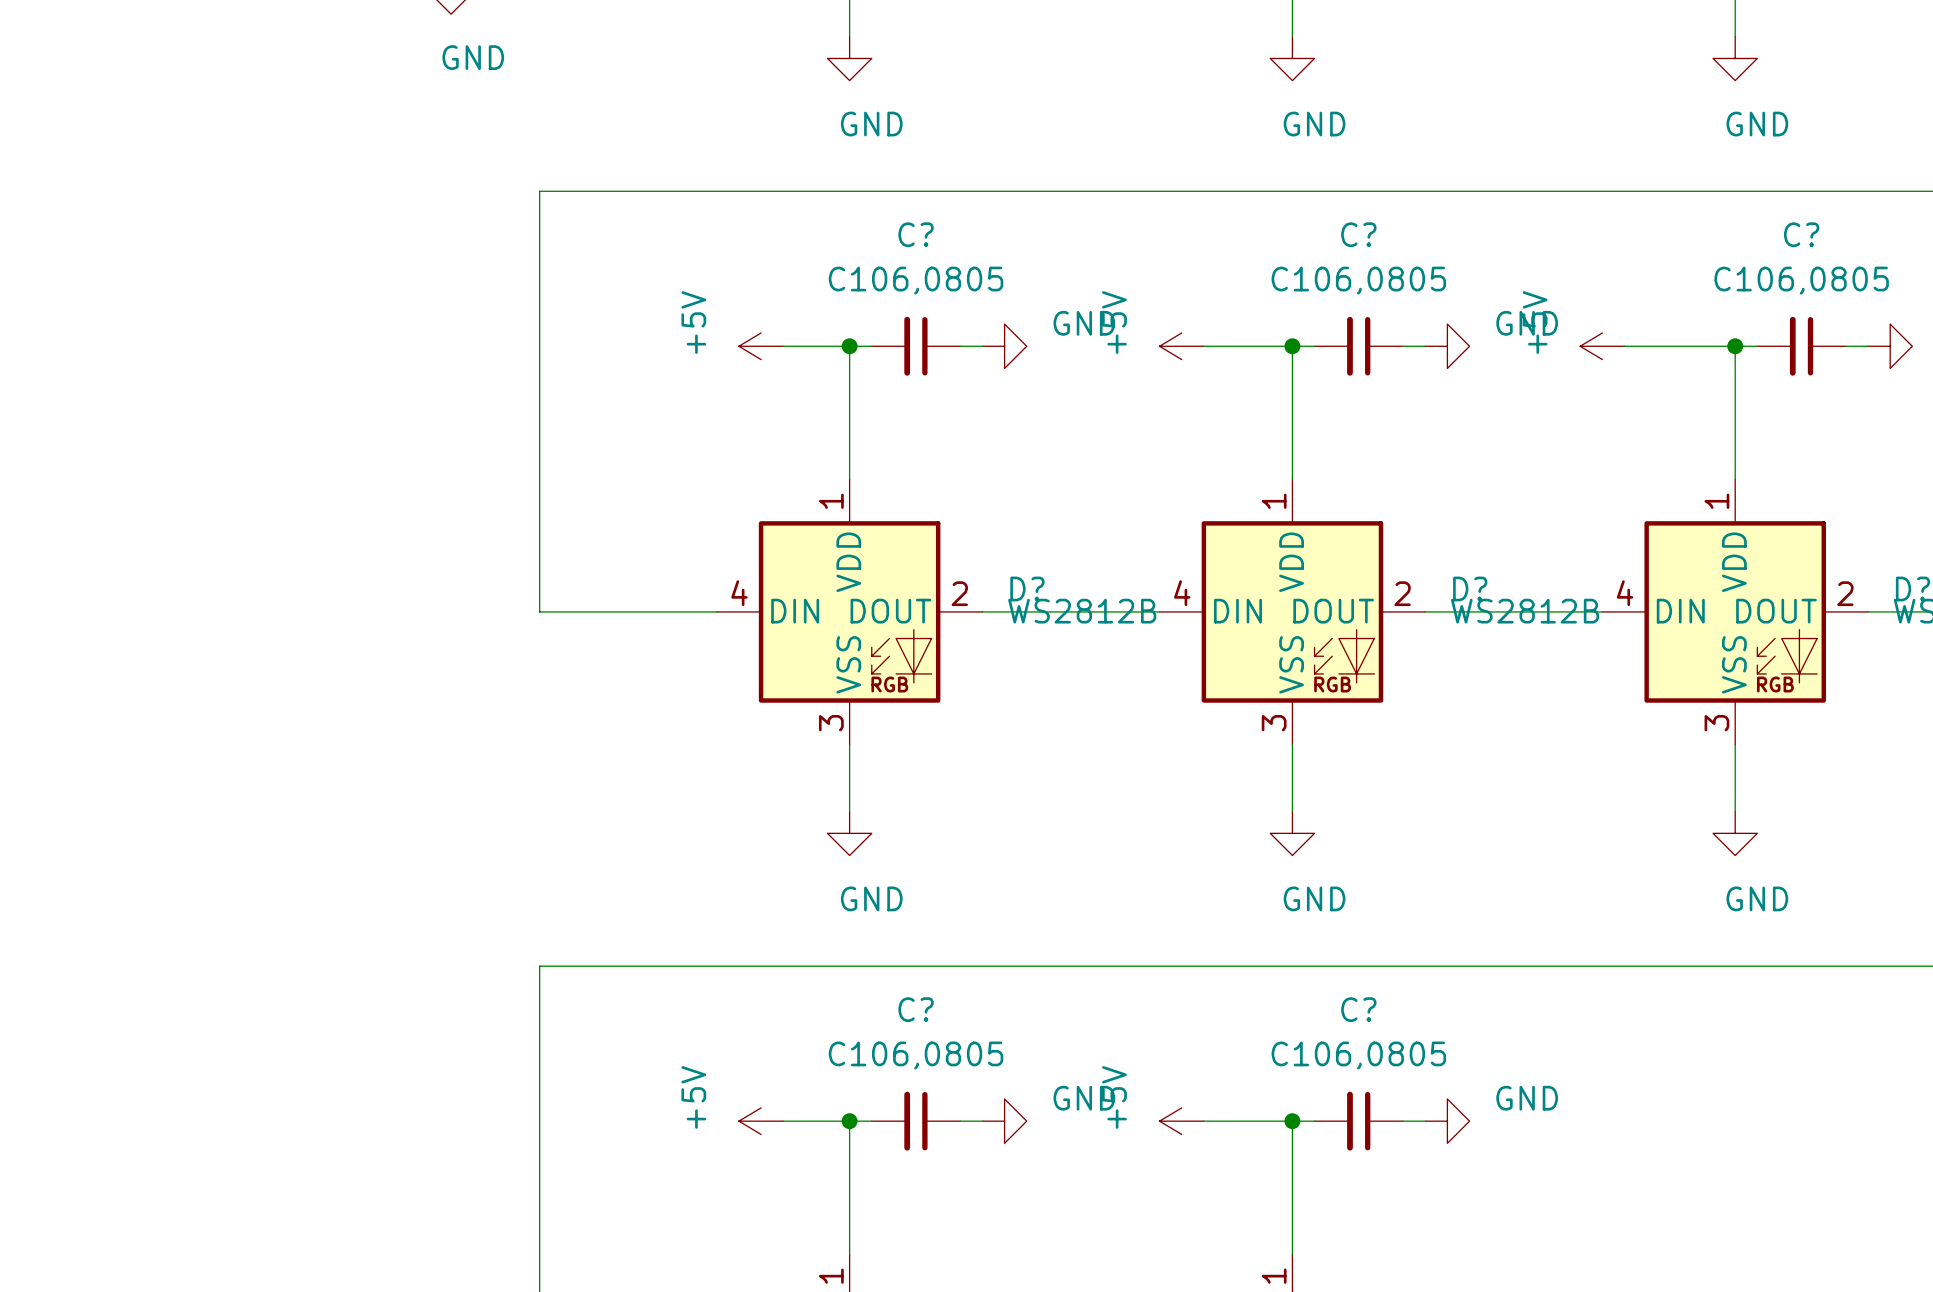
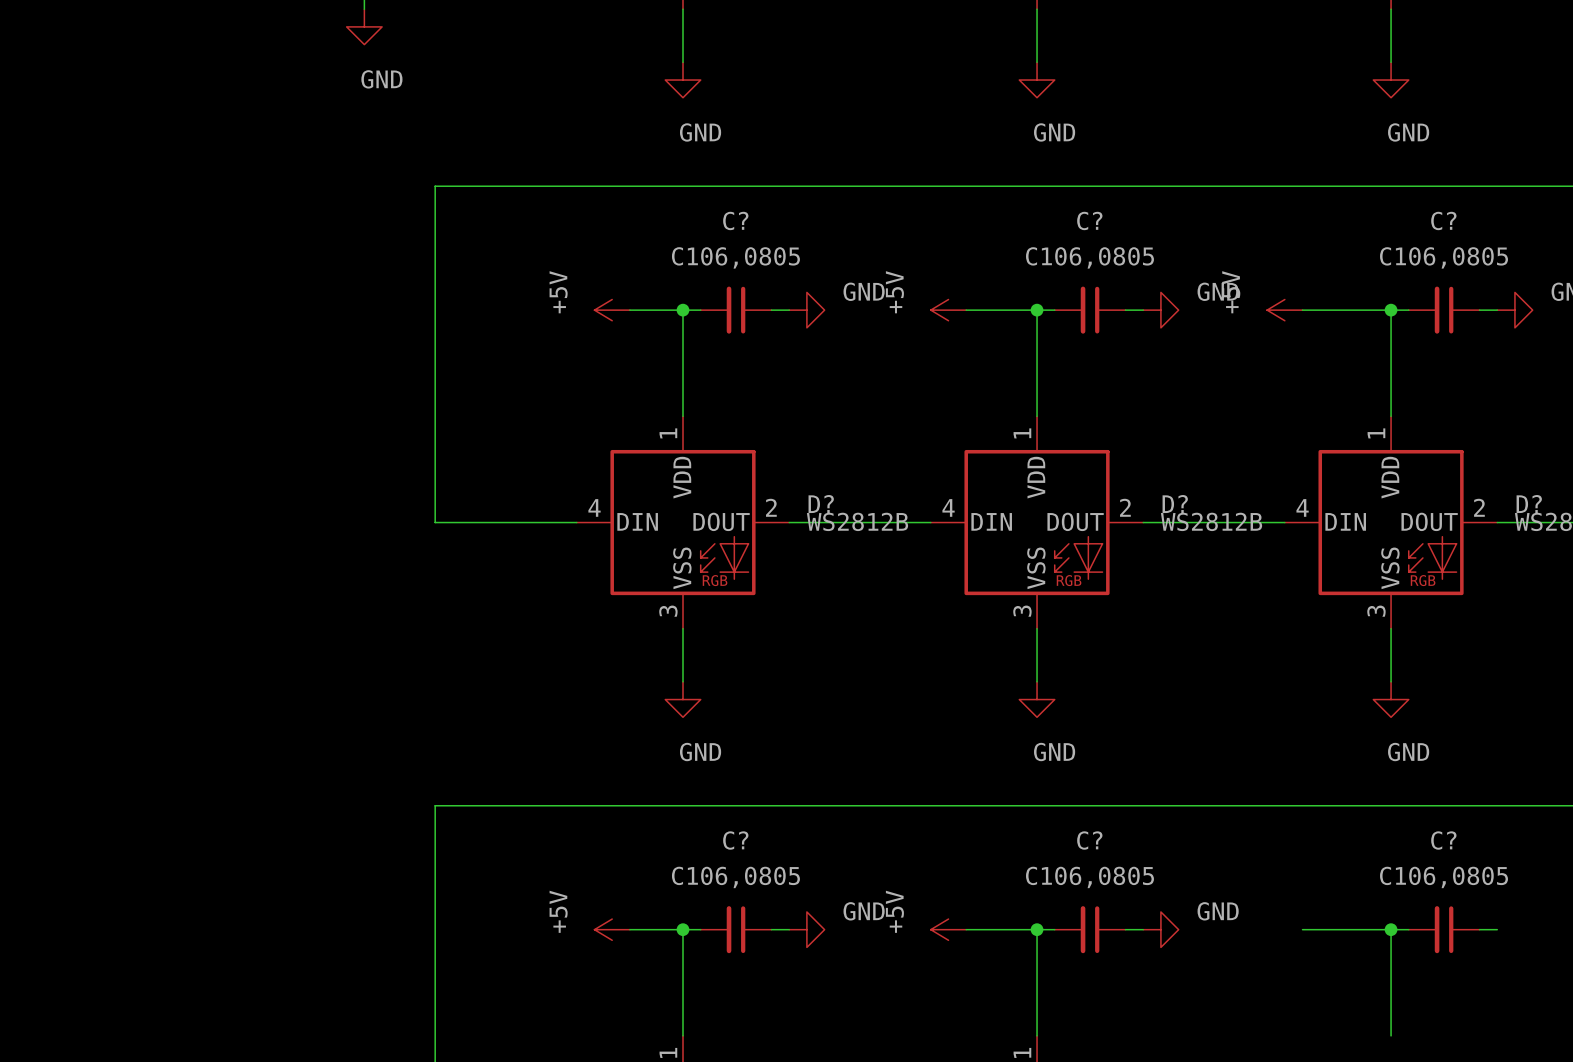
wire: none -> (1302, 929) (1408, 929)
wire: none -> (1391, 929) (1391, 1035)
junction: none -> (1391, 929)
C?: none -> C106,0805 (1444, 929)
wire: none -> (1479, 929) (1497, 929)

